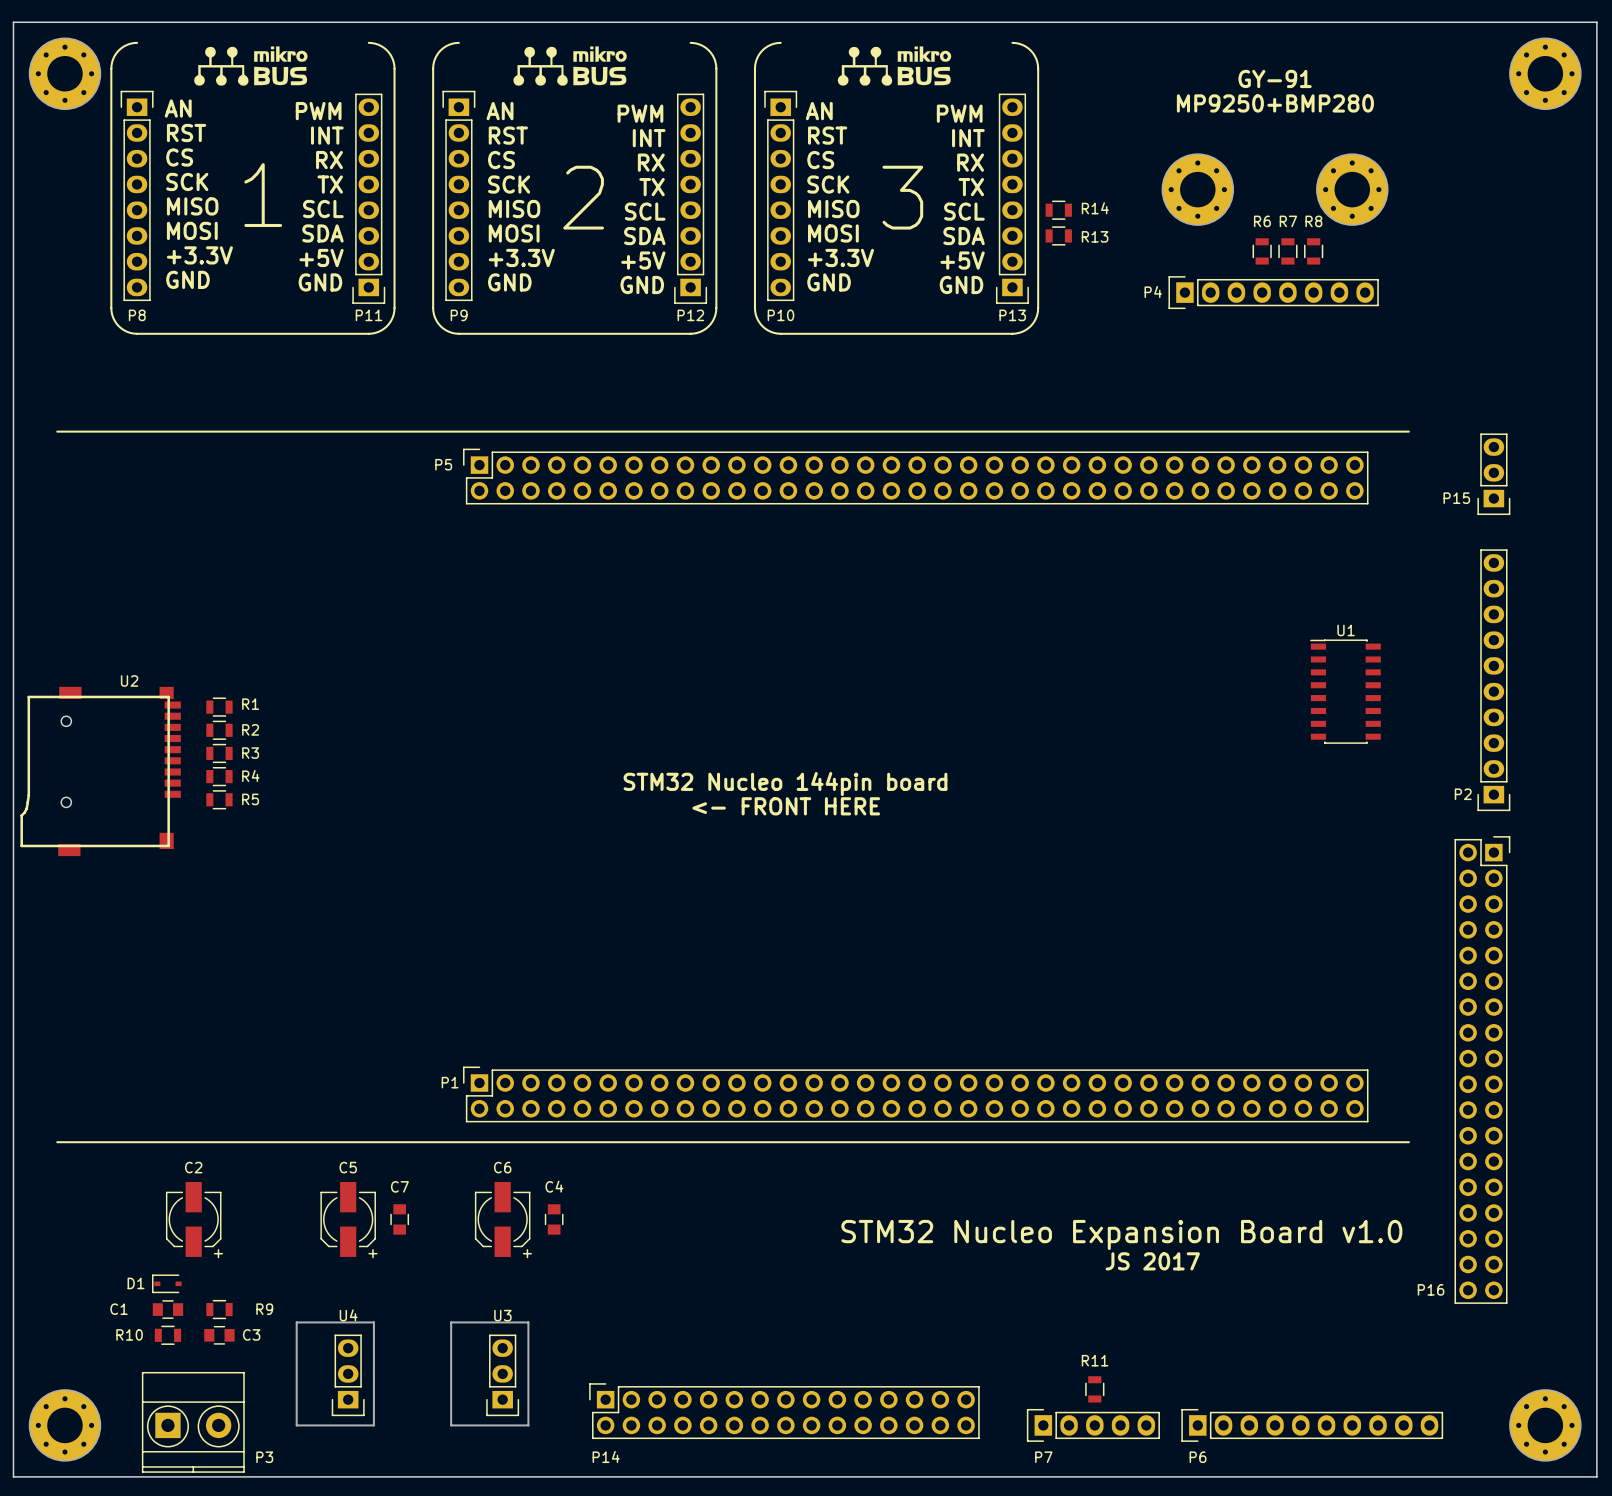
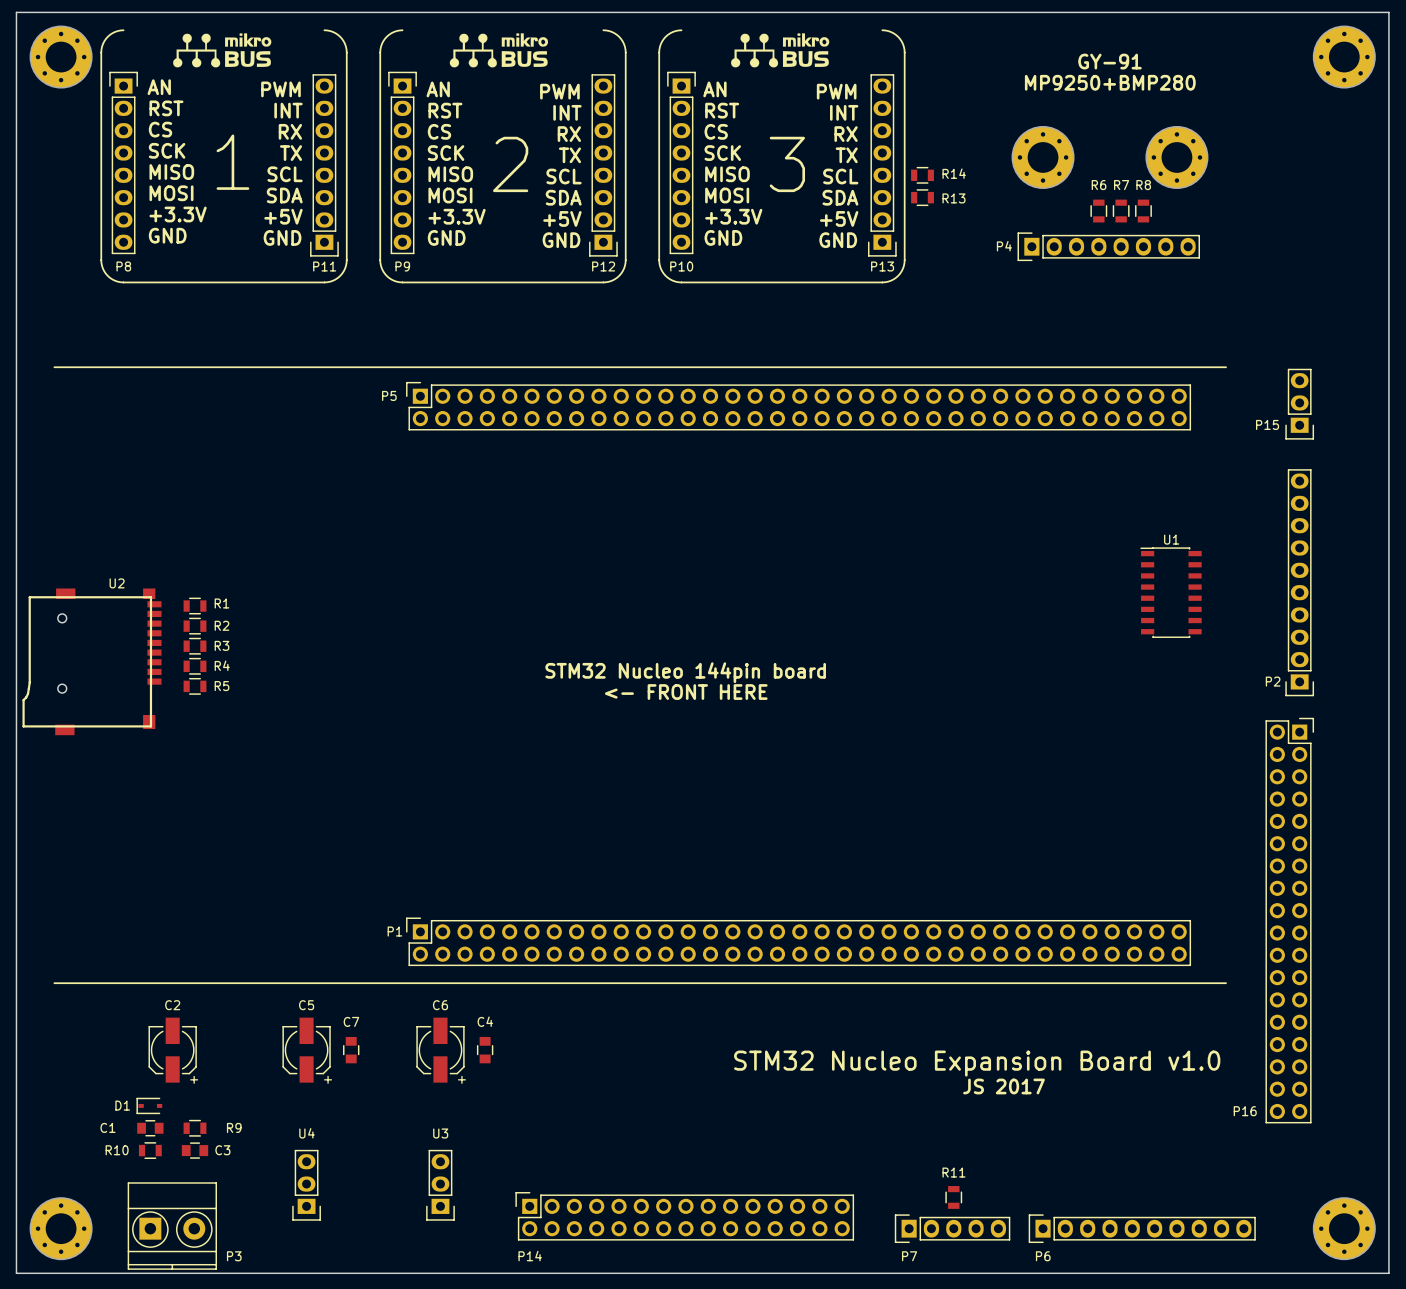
line: (296, 1322) (296, 1425) (373, 1425) (373, 1322) (296, 1322) -> none
line: (451, 1322) (528, 1322) (528, 1425) (451, 1425) (451, 1322) -> none

